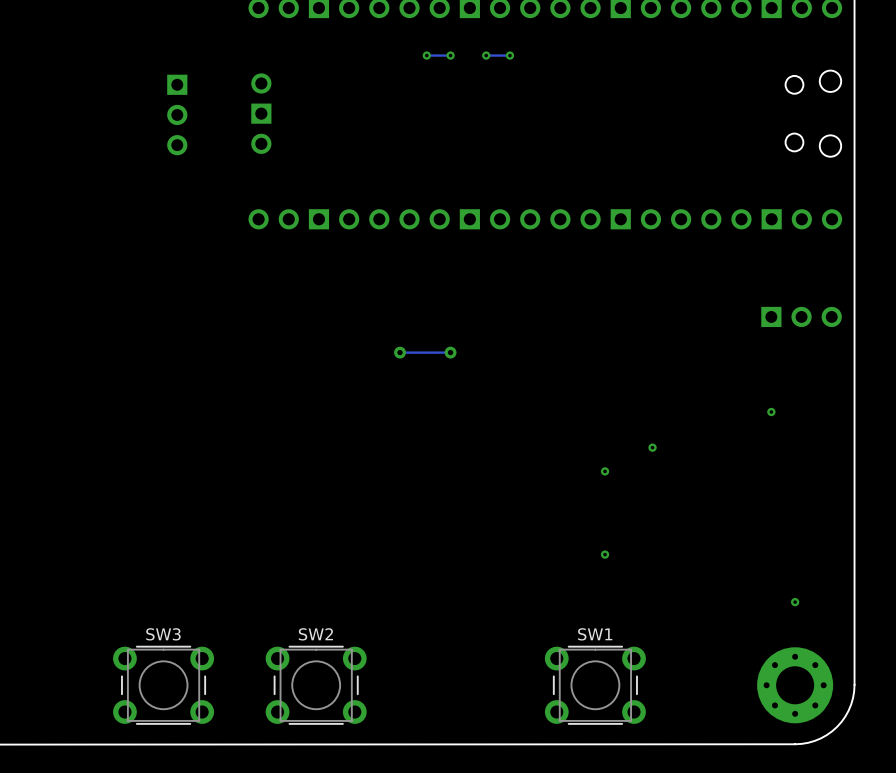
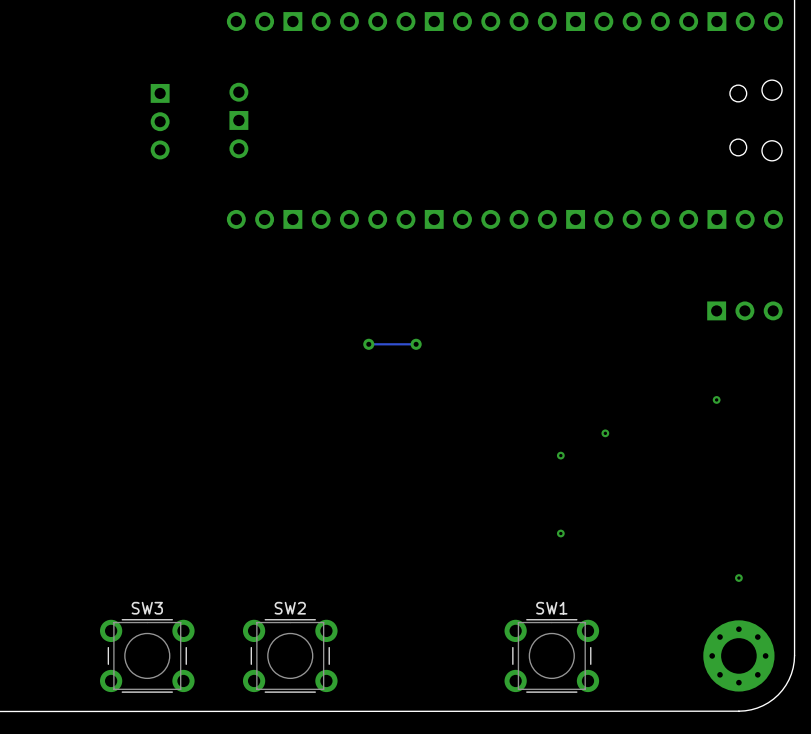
via: (426, 55) -> none
track: (450, 55) (426, 55) -> none
via: (450, 55) -> none
via: (486, 55) -> none
track: (509, 55) (486, 55) -> none
via: (509, 55) -> none

